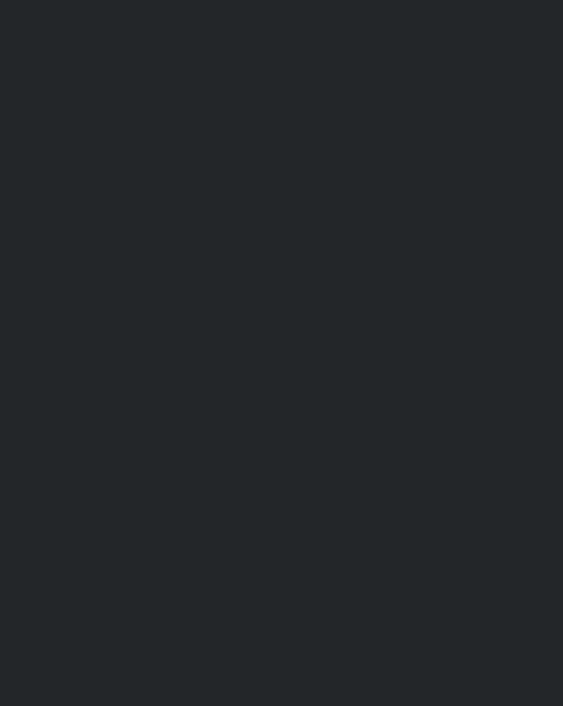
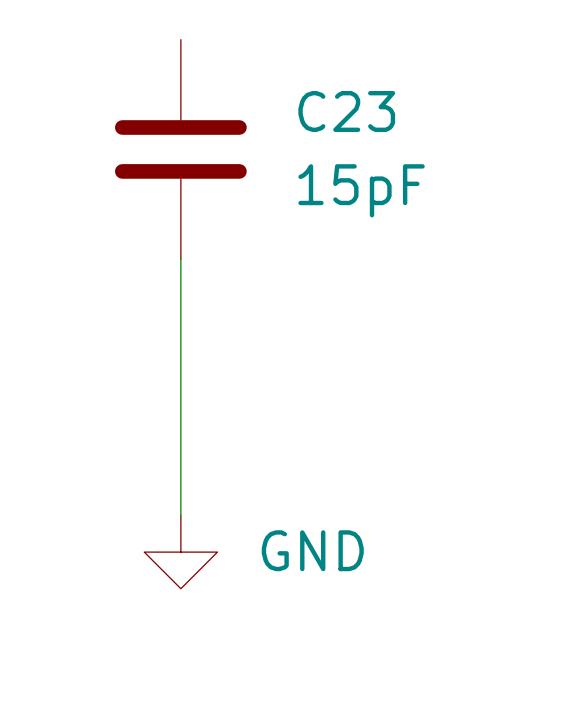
C23: none -> 15pF (180, 149)
wire: none -> (180, 259) (180, 515)
power symbol: none -> GND (180, 552)

